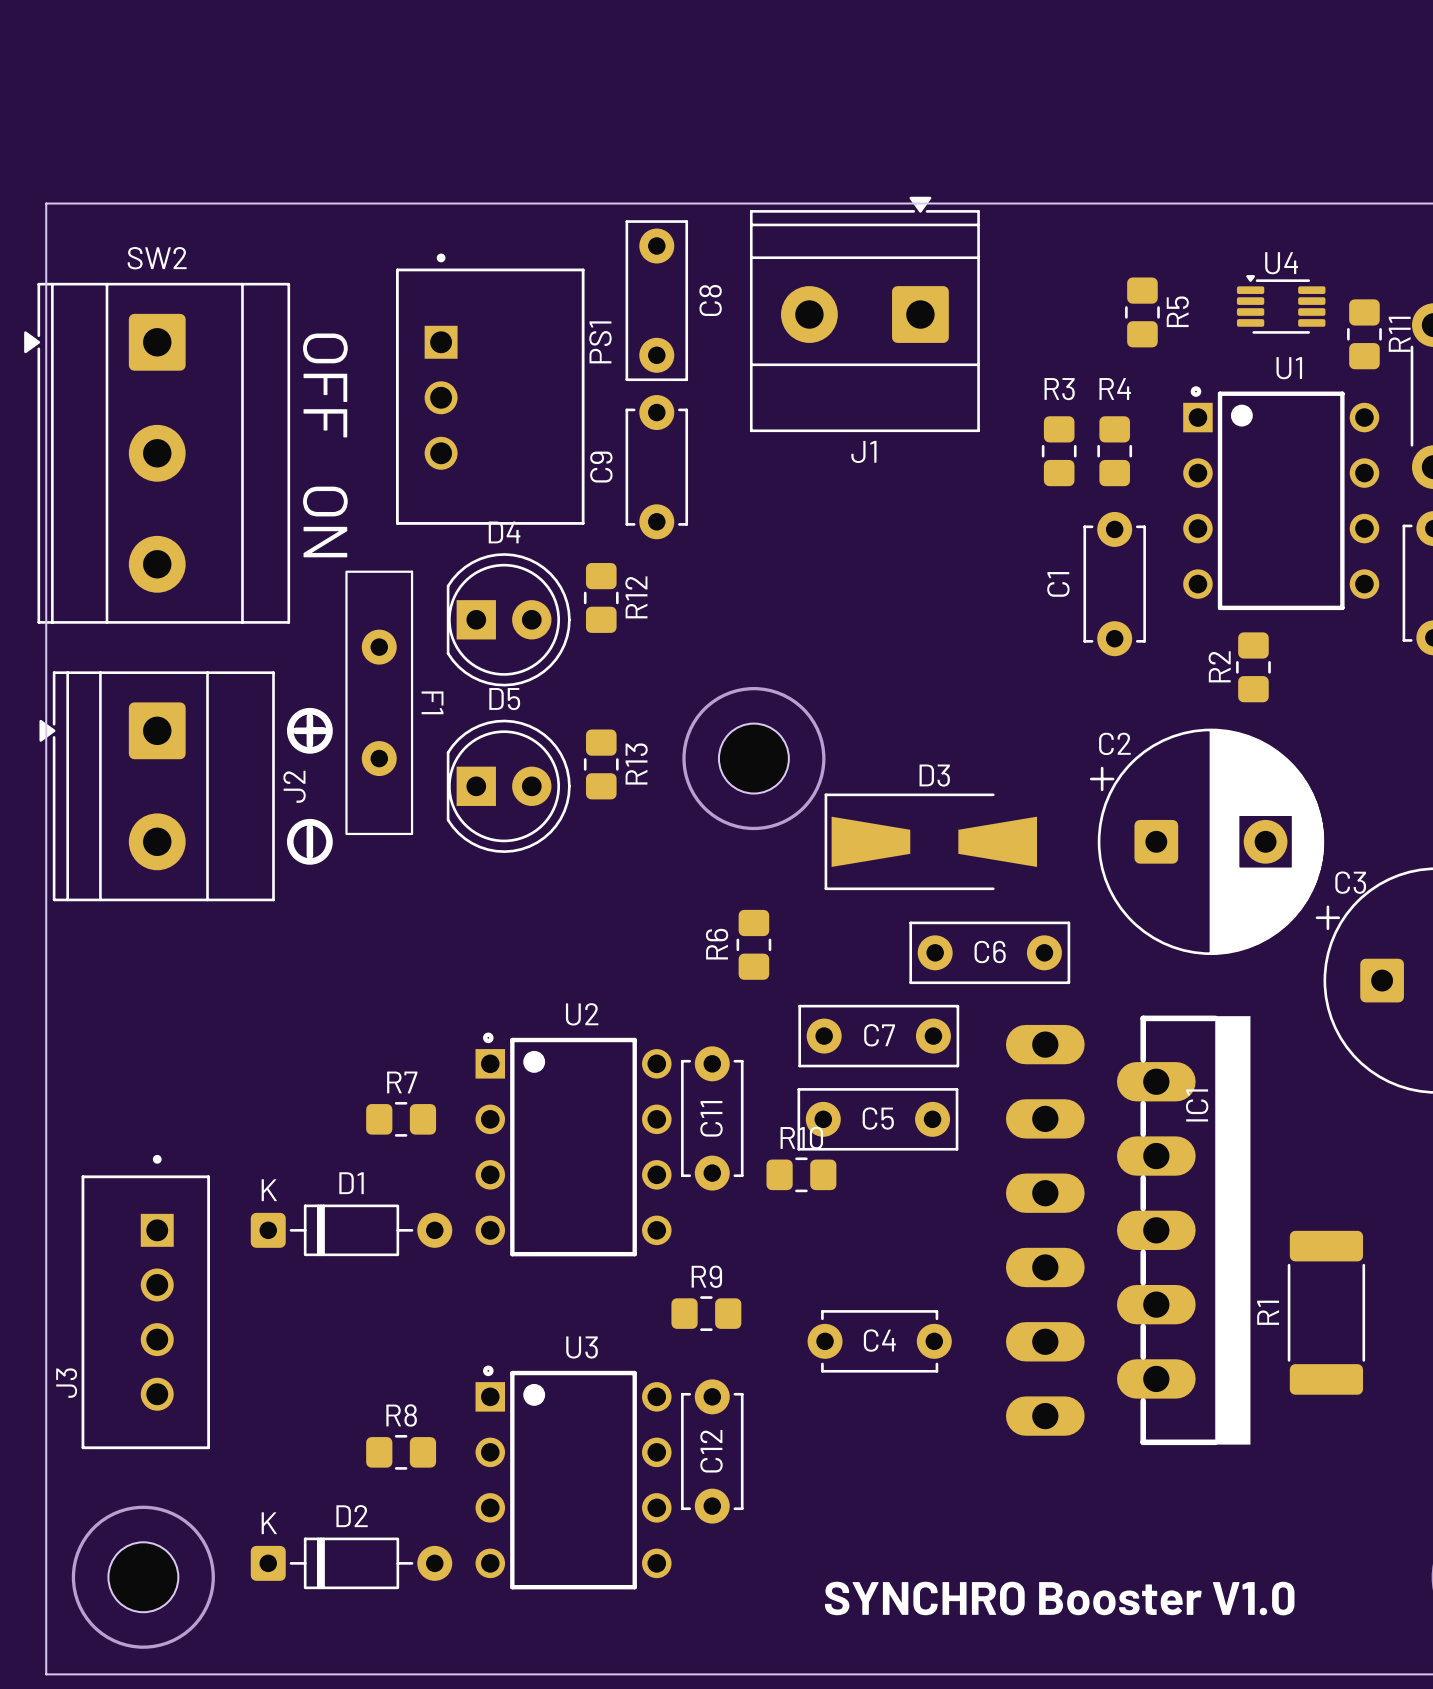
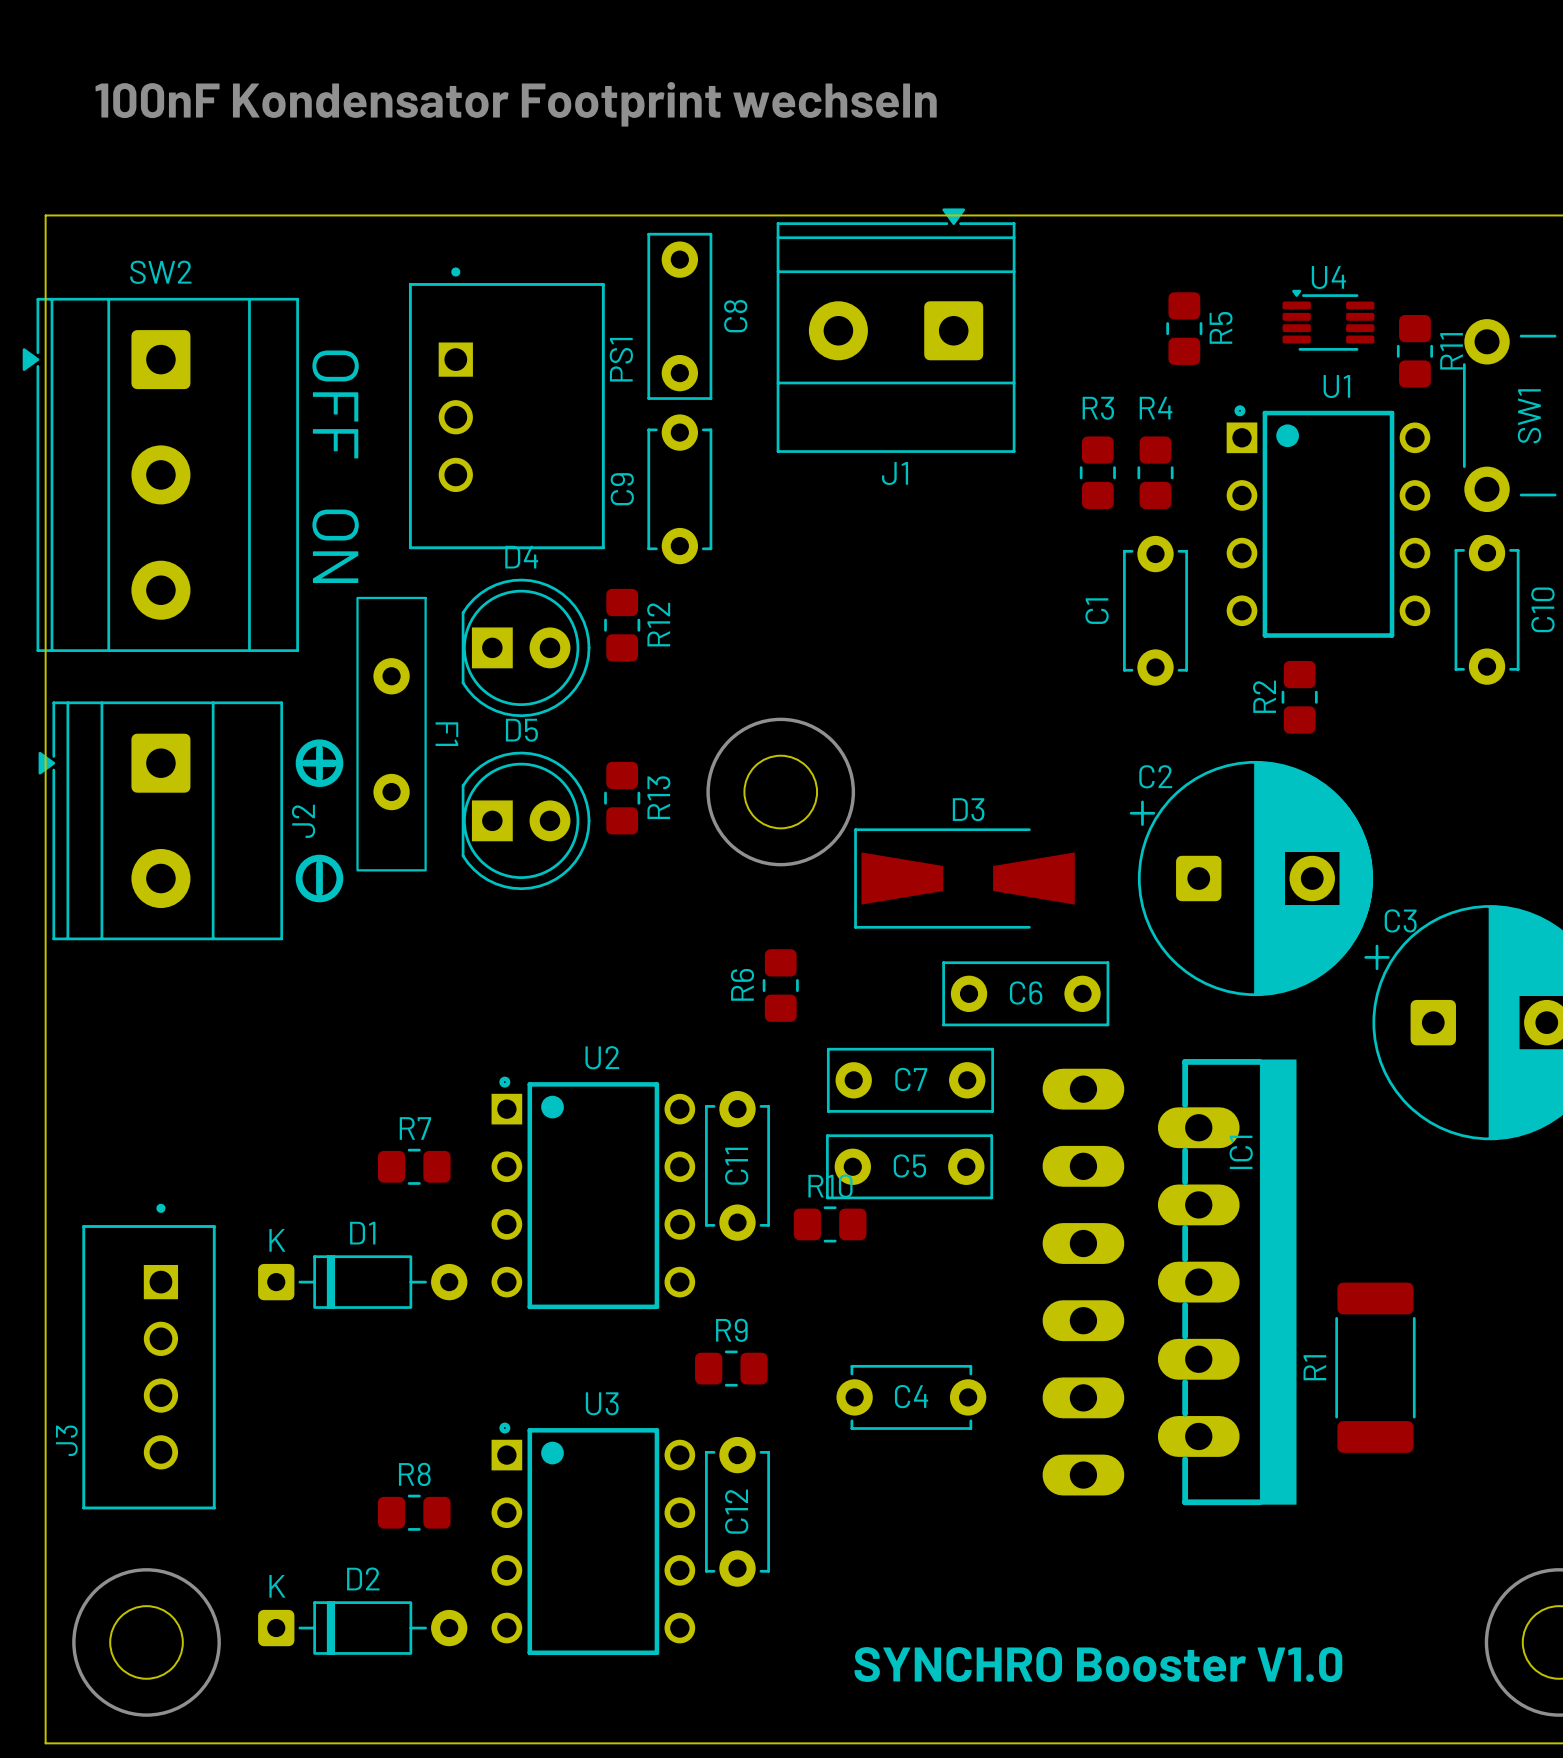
text: none -> 100nF Kondensator Footprint wechseln (516, 104)

